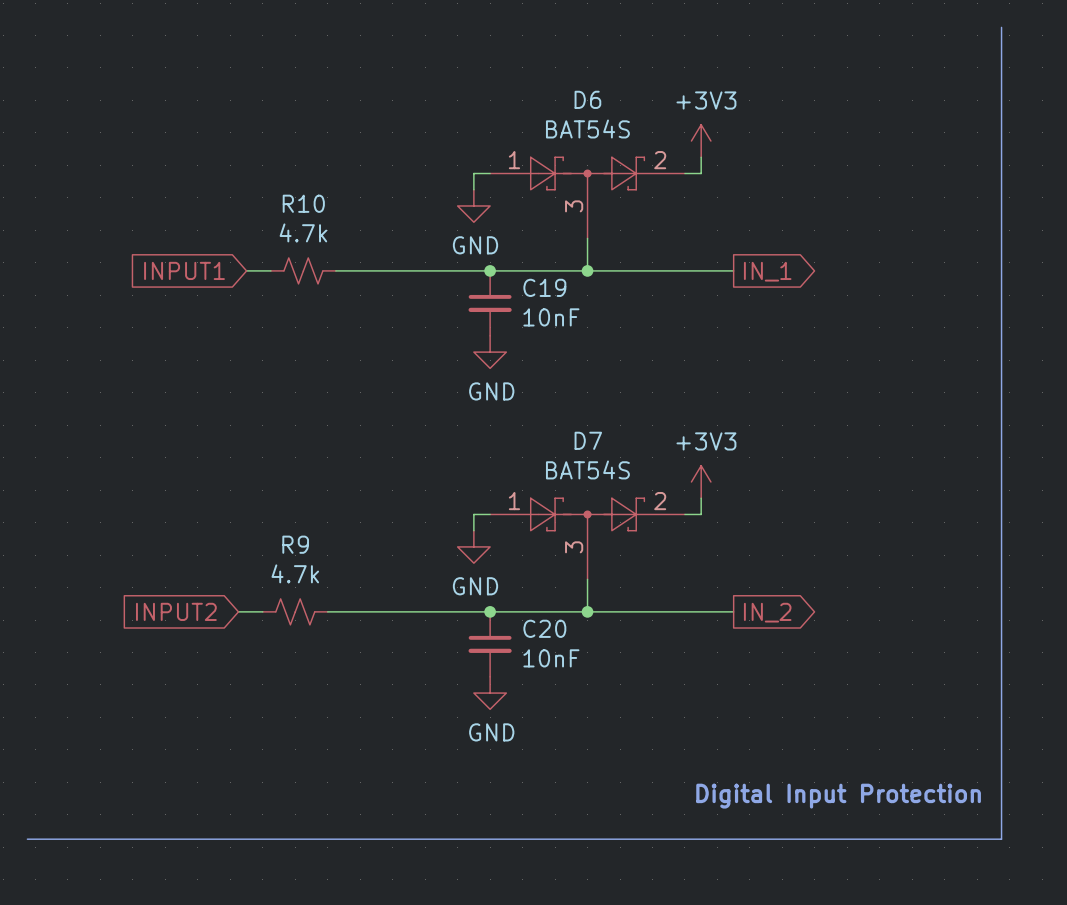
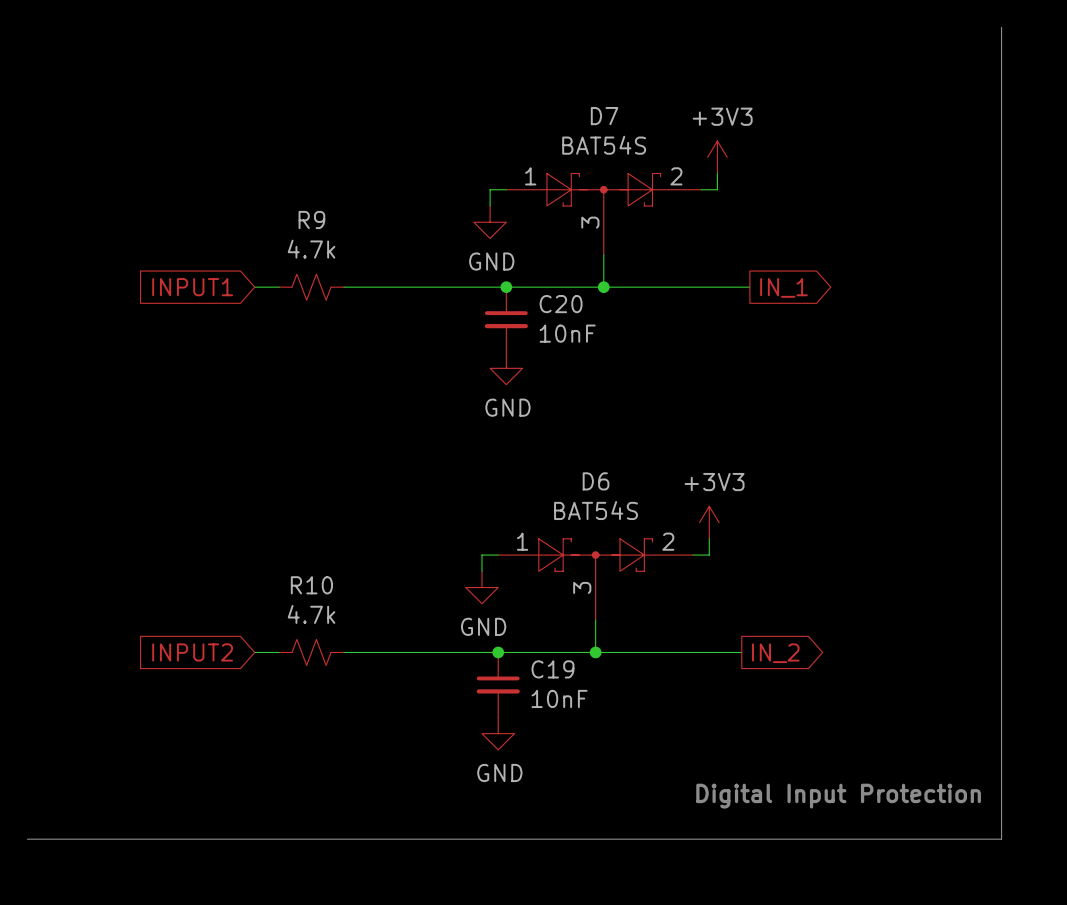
power symbol position: +3V3 (701, 141) -> +3V3 (717, 157)
wire: (701, 157) (701, 173) (684, 173) -> (717, 173) (717, 189) (701, 189)
wire: (490, 173) (473, 173) (473, 189) -> (506, 189) (490, 189) (490, 205)
D6 position: (587, 197) -> (595, 579)
power symbol position: GND (473, 205) -> GND (490, 222)
wire: (587, 238) (587, 270) -> (603, 254) (603, 287)
global label position: INPUT1 (184, 270) -> INPUT1 (192, 287)
wire: (246, 270) (270, 270) -> (254, 287) (279, 287)
R10 position: (303, 270) -> (311, 652)
wire: (335, 270) (733, 270) -> none
junction position: (490, 270) -> (506, 287)
junction position: (587, 270) -> (603, 287)
global label position: IN_1 (767, 271) -> IN_1 (783, 287)
wire: none -> (343, 287) (749, 287)
C19 position: (490, 303) -> (498, 684)
power symbol position: GND (490, 352) -> GND (506, 368)
power symbol position: +3V3 (701, 481) -> +3V3 (709, 522)
wire: (701, 498) (701, 514) (684, 514) -> (709, 538) (709, 555) (693, 555)
wire: (490, 514) (473, 514) (473, 530) -> (498, 555) (481, 555) (481, 571)
D7 position: (587, 538) -> (603, 214)
power symbol position: GND (473, 546) -> GND (481, 587)
wire: (587, 579) (587, 611) -> (595, 620) (595, 652)
global label position: INPUT2 (176, 611) -> INPUT2 (192, 652)
wire: (238, 611) (262, 611) -> (254, 652) (279, 652)
R9 position: (295, 611) -> (311, 287)
wire: (327, 611) (733, 611) -> none
junction position: (490, 611) -> (498, 652)
junction position: (587, 611) -> (595, 652)
global label position: IN_2 (767, 612) -> IN_2 (775, 653)
C20 position: (490, 644) -> (506, 319)
wire: none -> (343, 652) (741, 652)
power symbol position: GND (490, 693) -> GND (498, 733)

